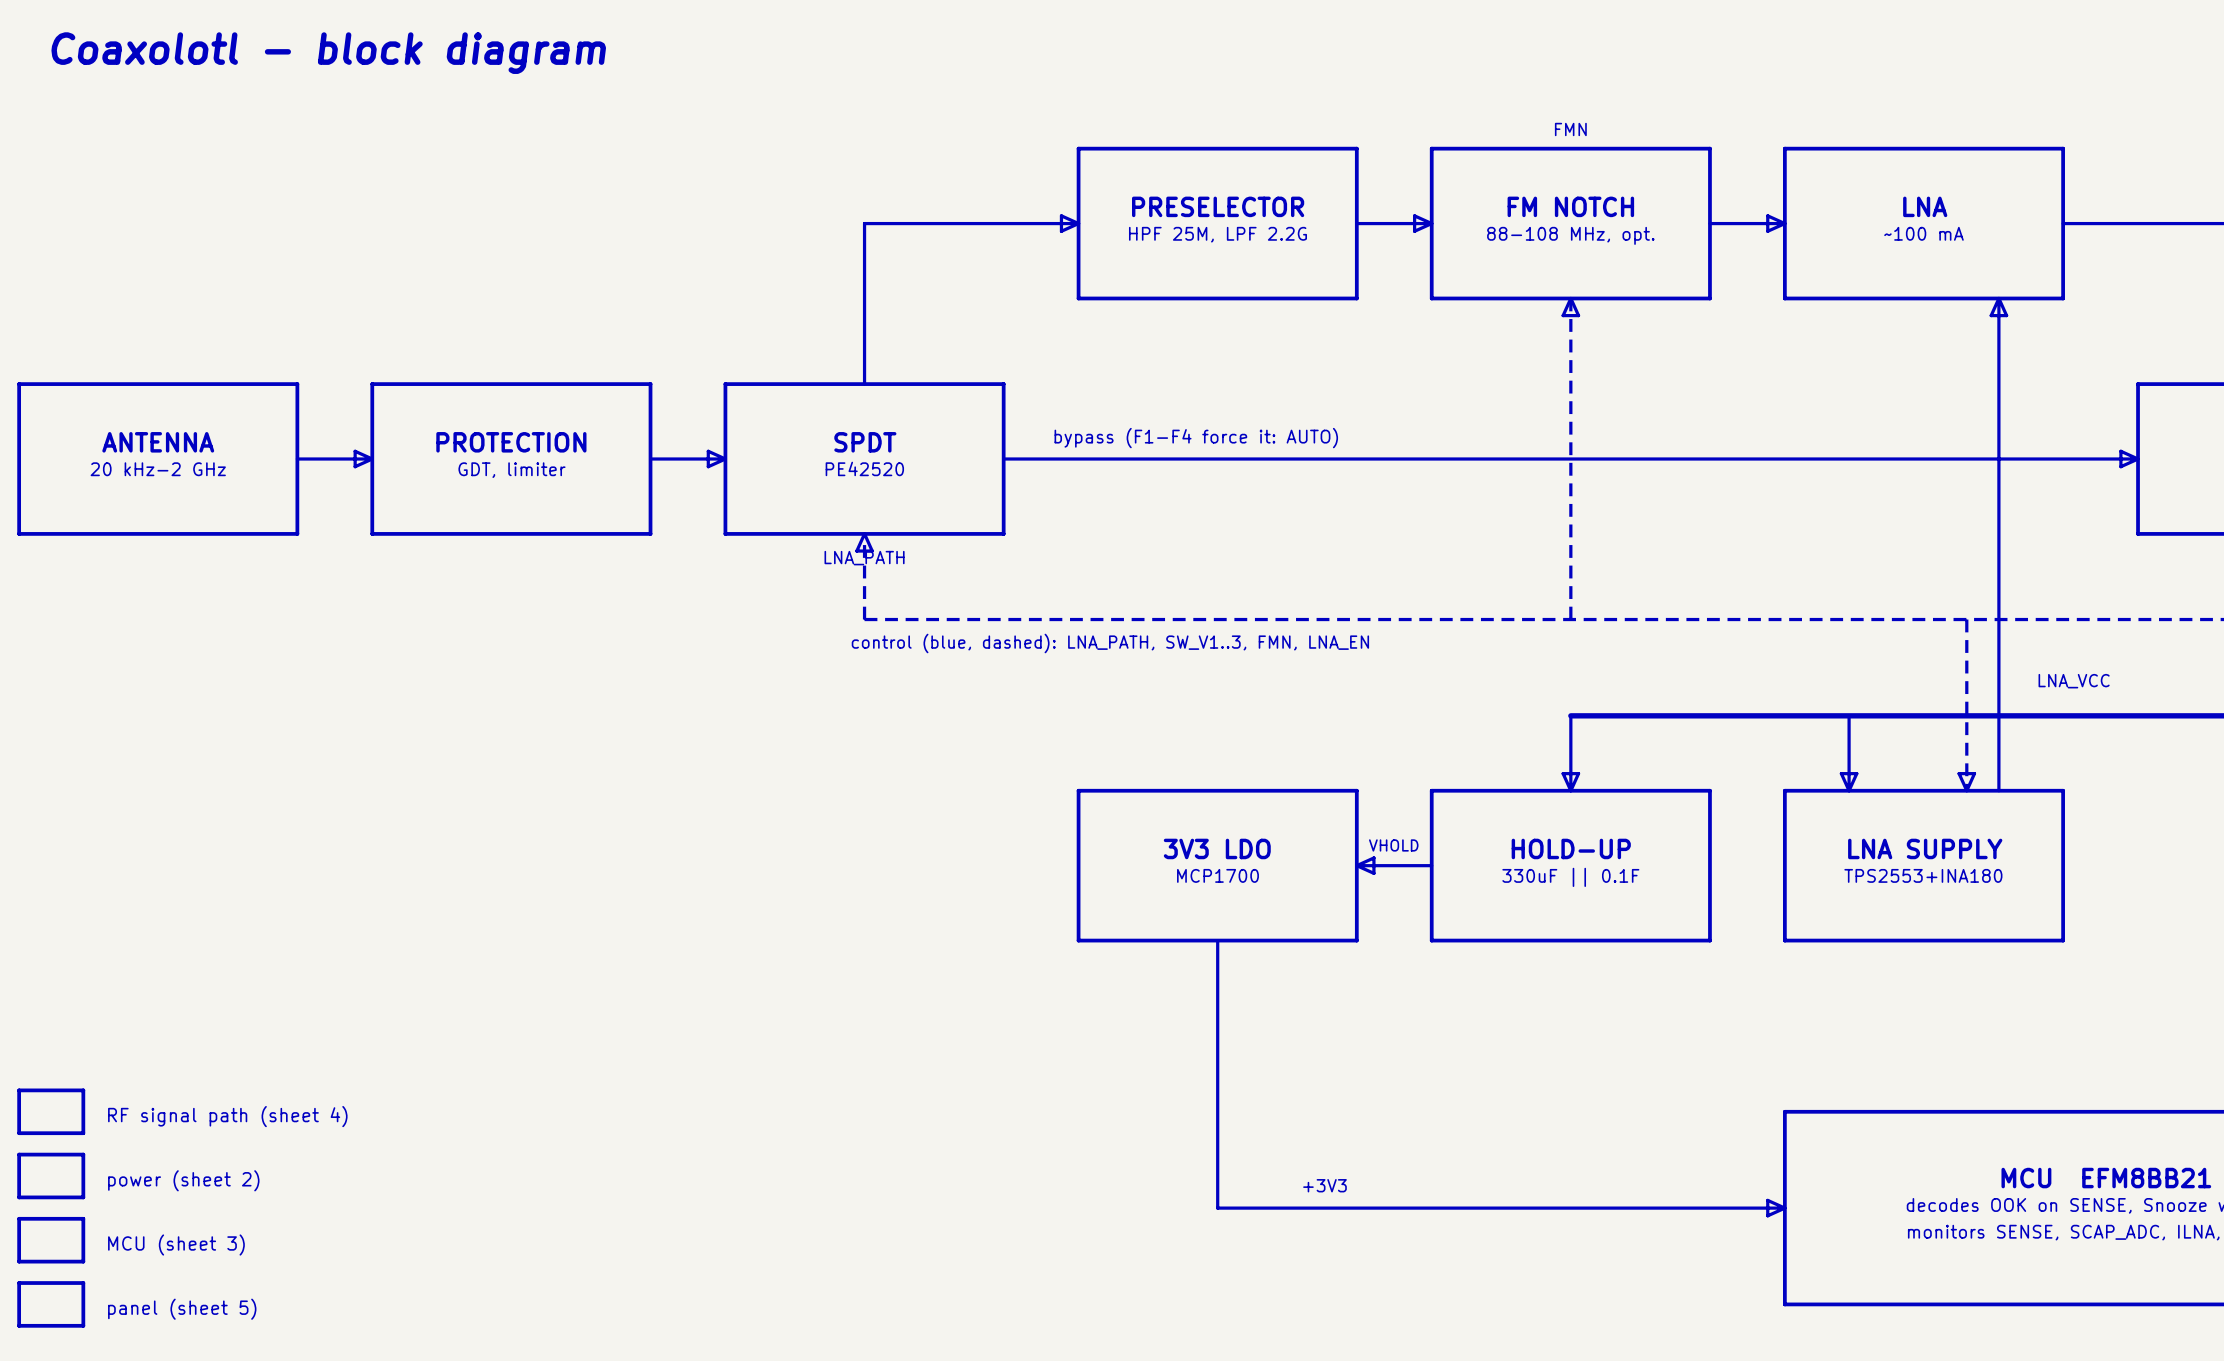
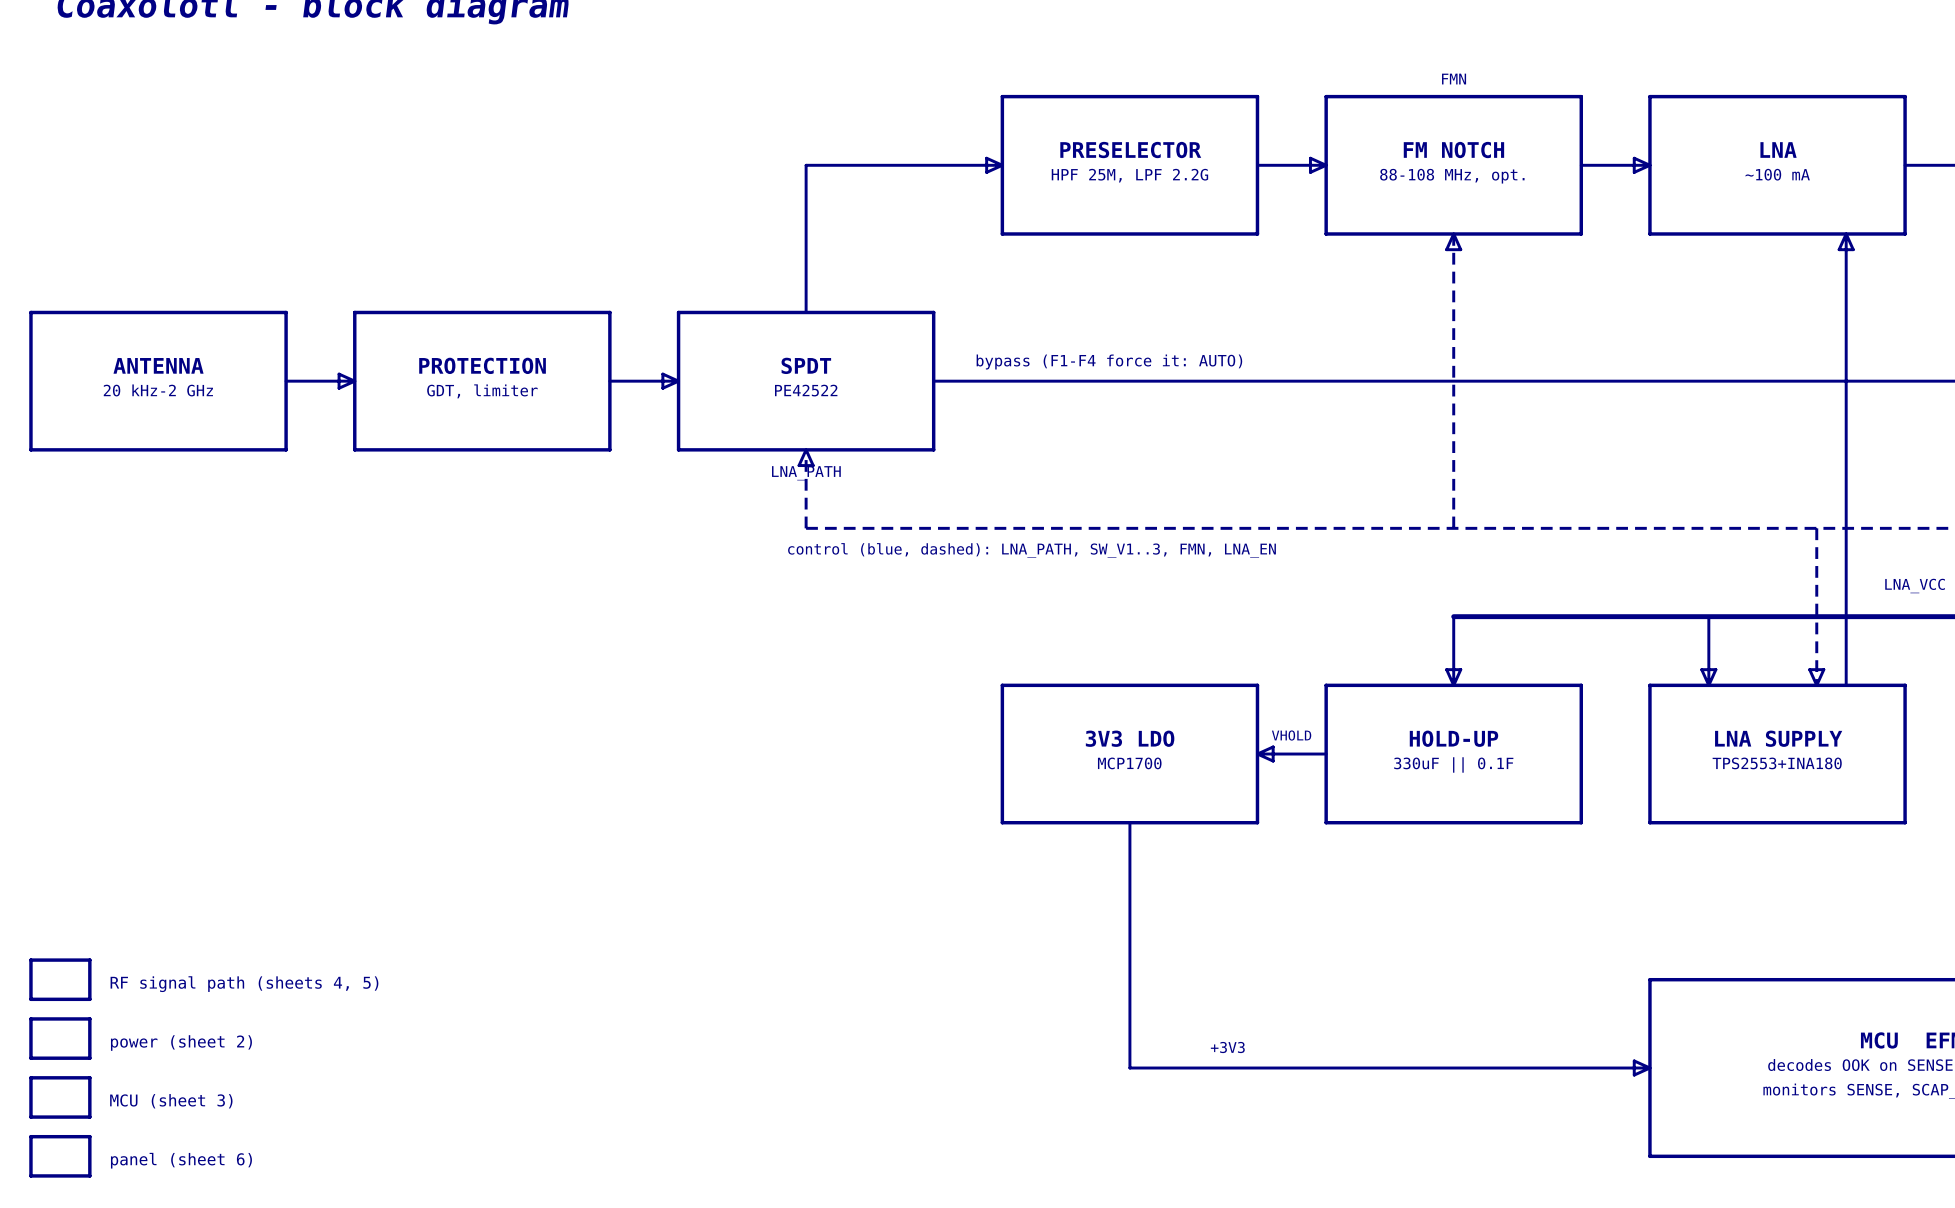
text: PE42520 (864, 468) -> PE42522 (806, 390)
text: RF signal path (sheet 4) (227, 1116) -> RF signal path (sheets 4, 5) (244, 984)
text: panel (sheet 5) (182, 1309) -> panel (sheet 6) (181, 1160)

